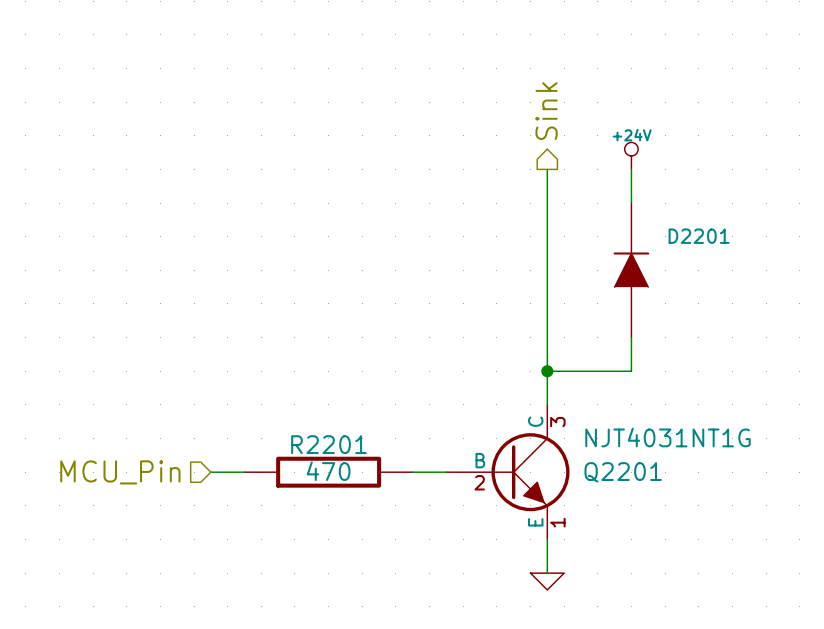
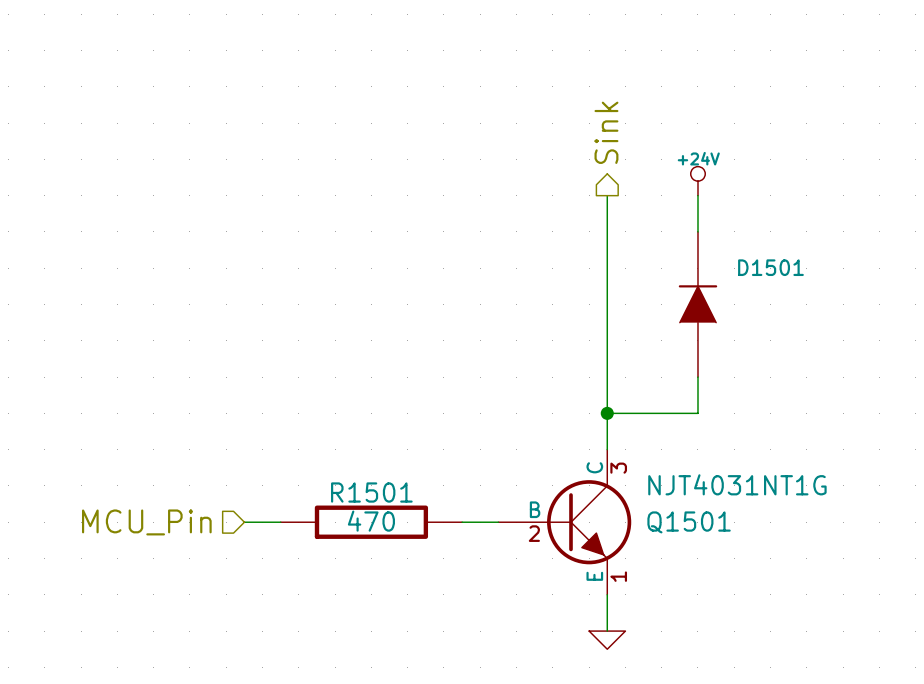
D2201 name: D2201 (699, 236) -> D1501 (770, 267)
R2201 name: R2201 (329, 444) -> R1501 (371, 492)
Q2201 name: Q2201 (623, 472) -> Q1501 (689, 522)

